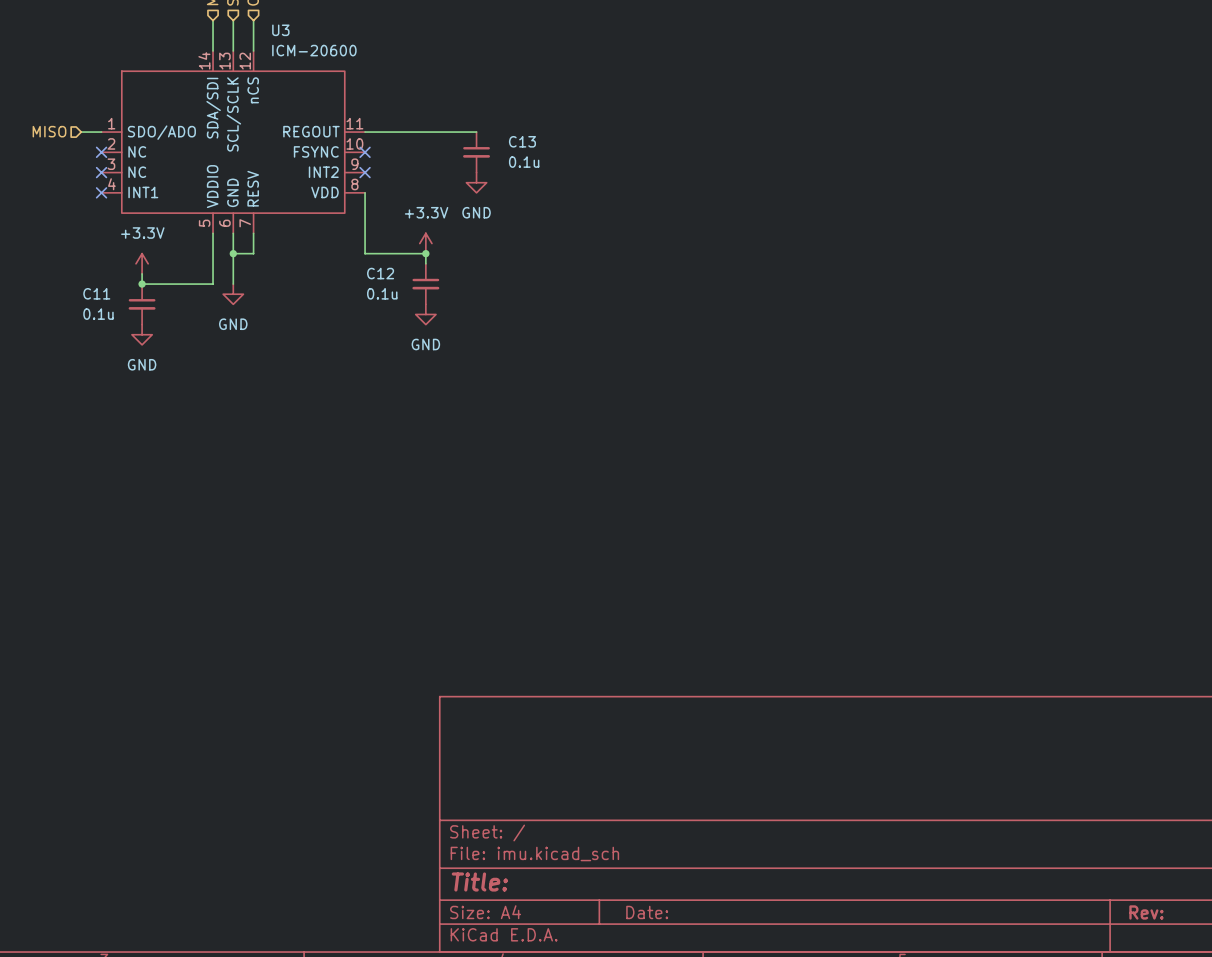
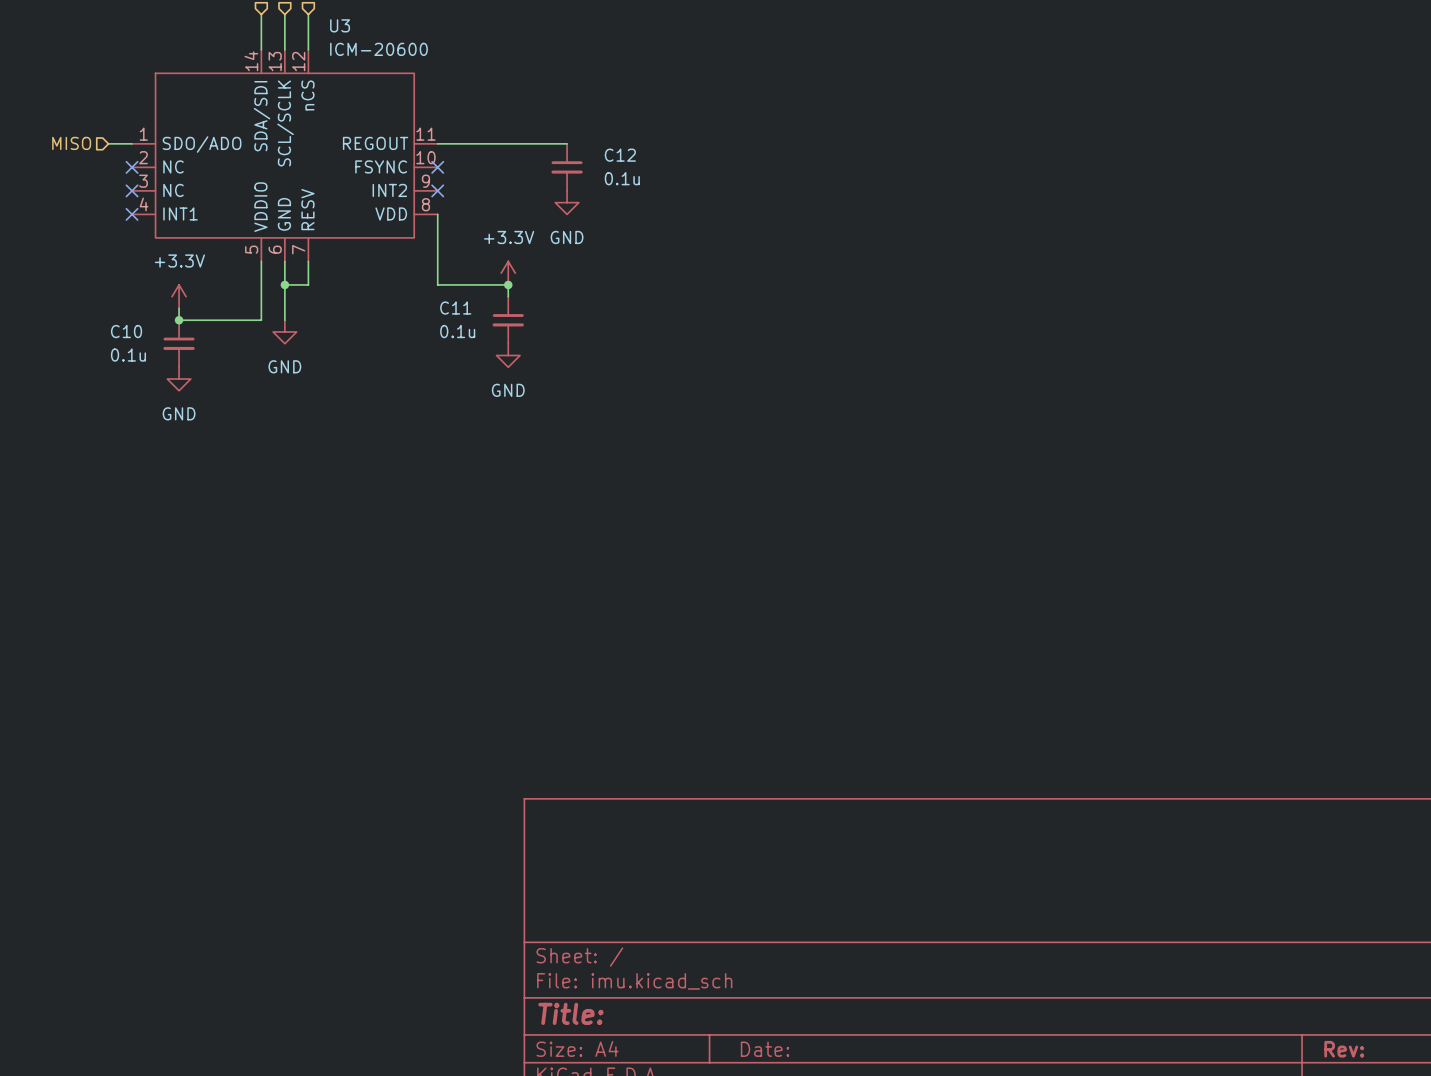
C13 name: C13 (522, 141) -> C12 (620, 155)
C12 name: C12 (380, 273) -> C11 (455, 308)
C11 name: C11 (96, 293) -> C10 (126, 331)

